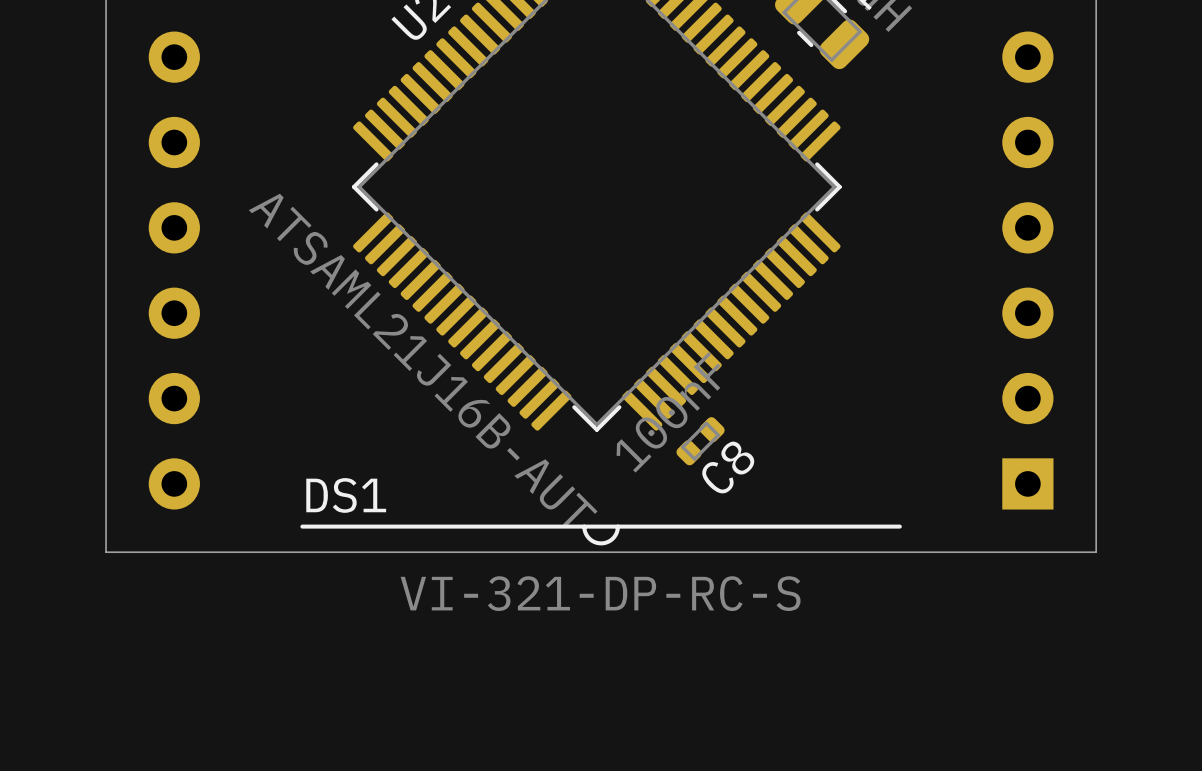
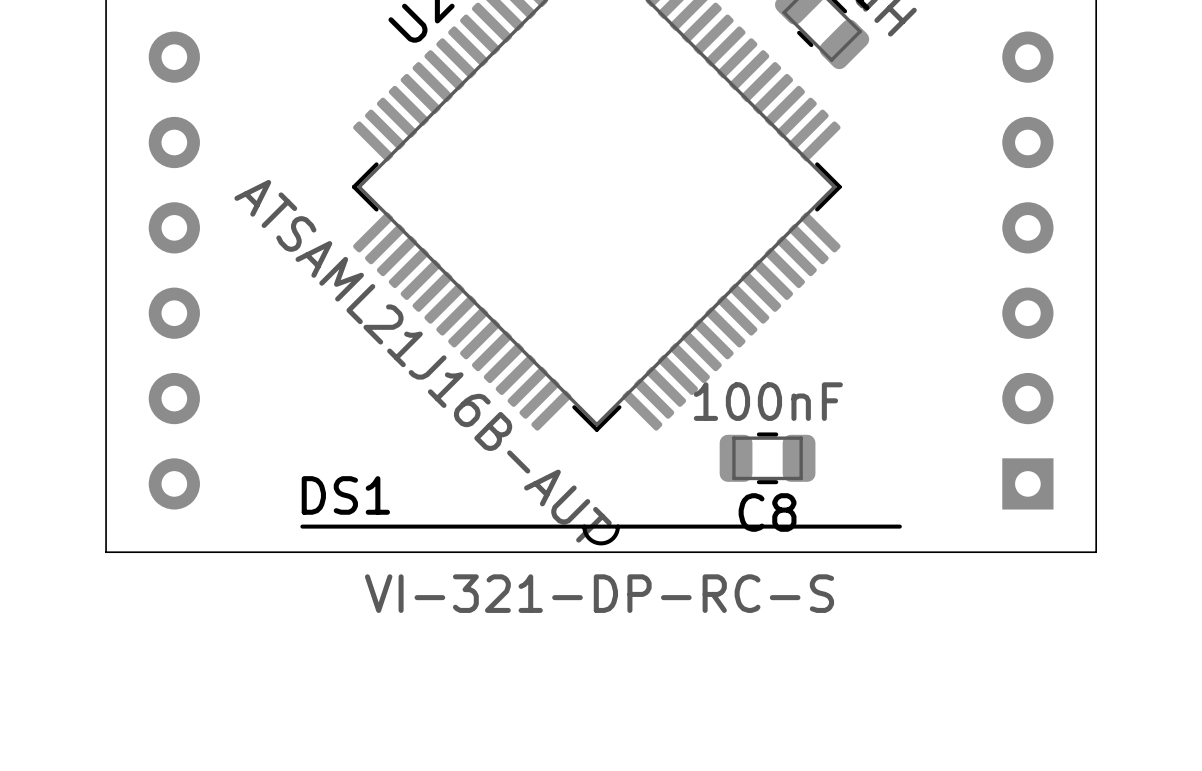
C8 footprint: [676, 417, 725, 466] -> [719, 432, 816, 485]

